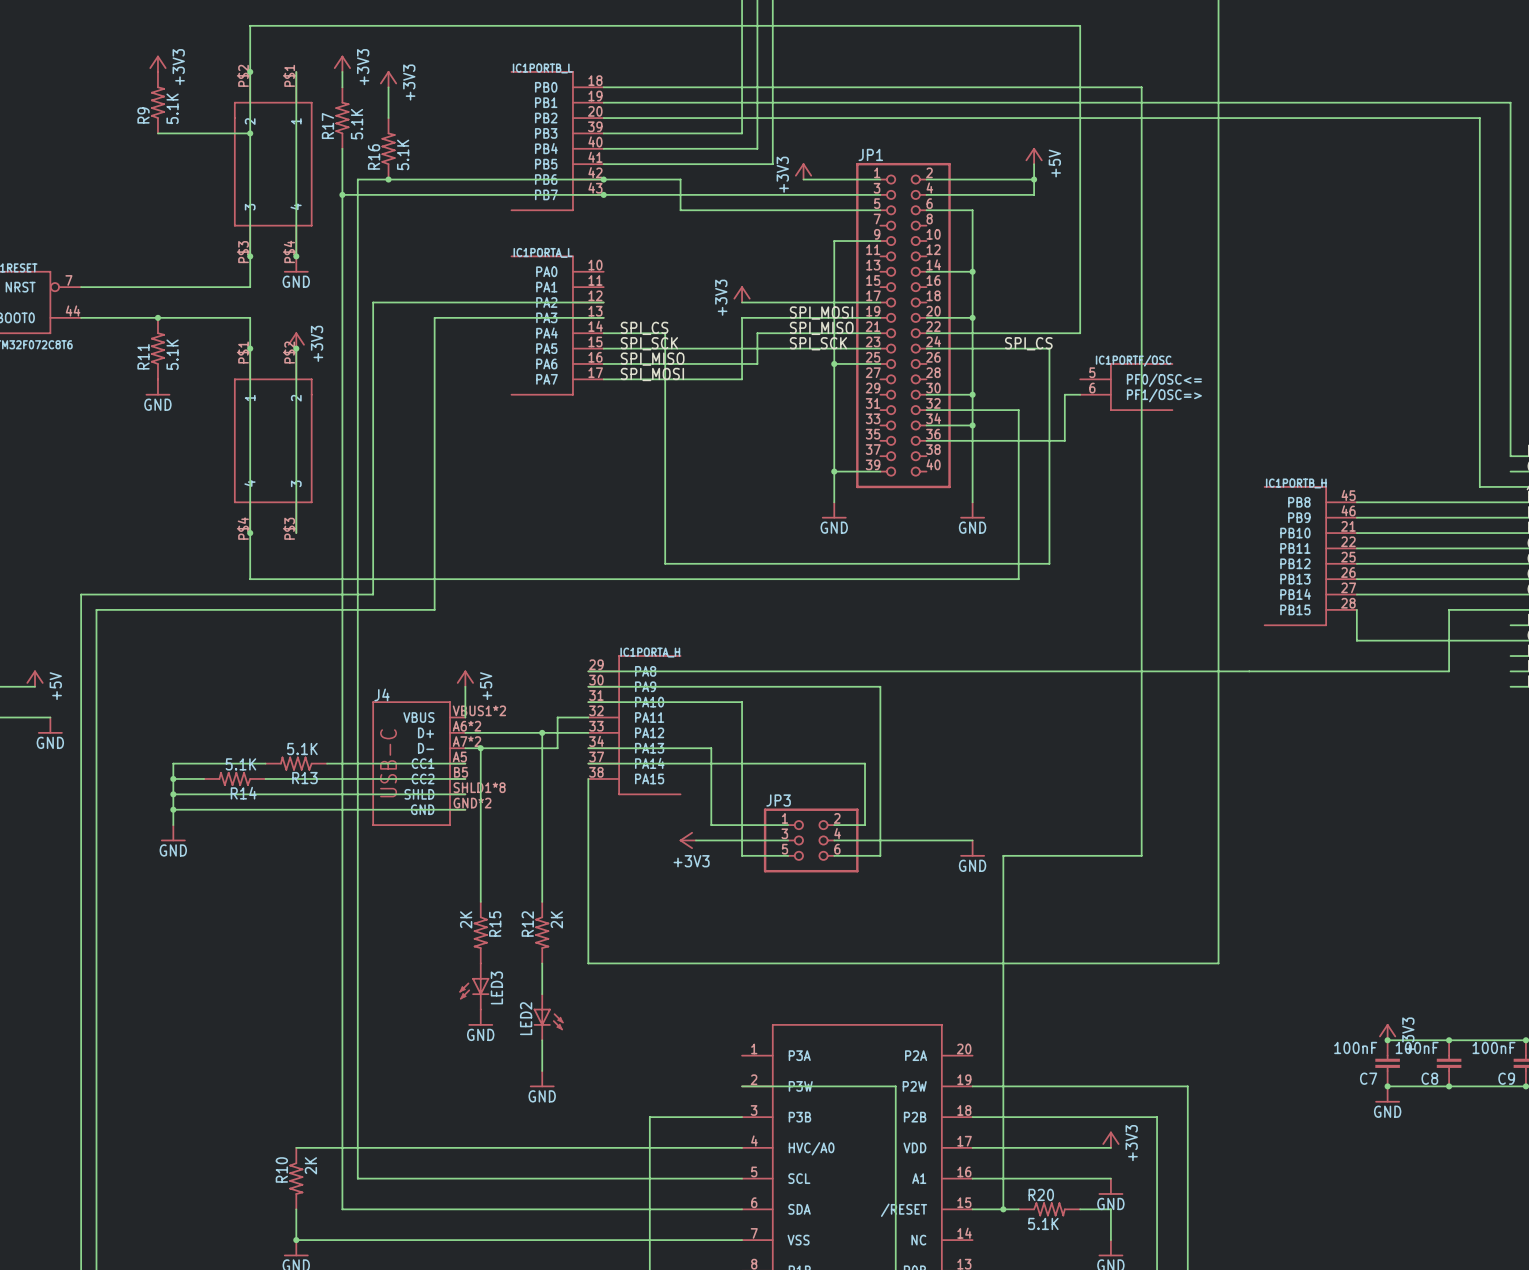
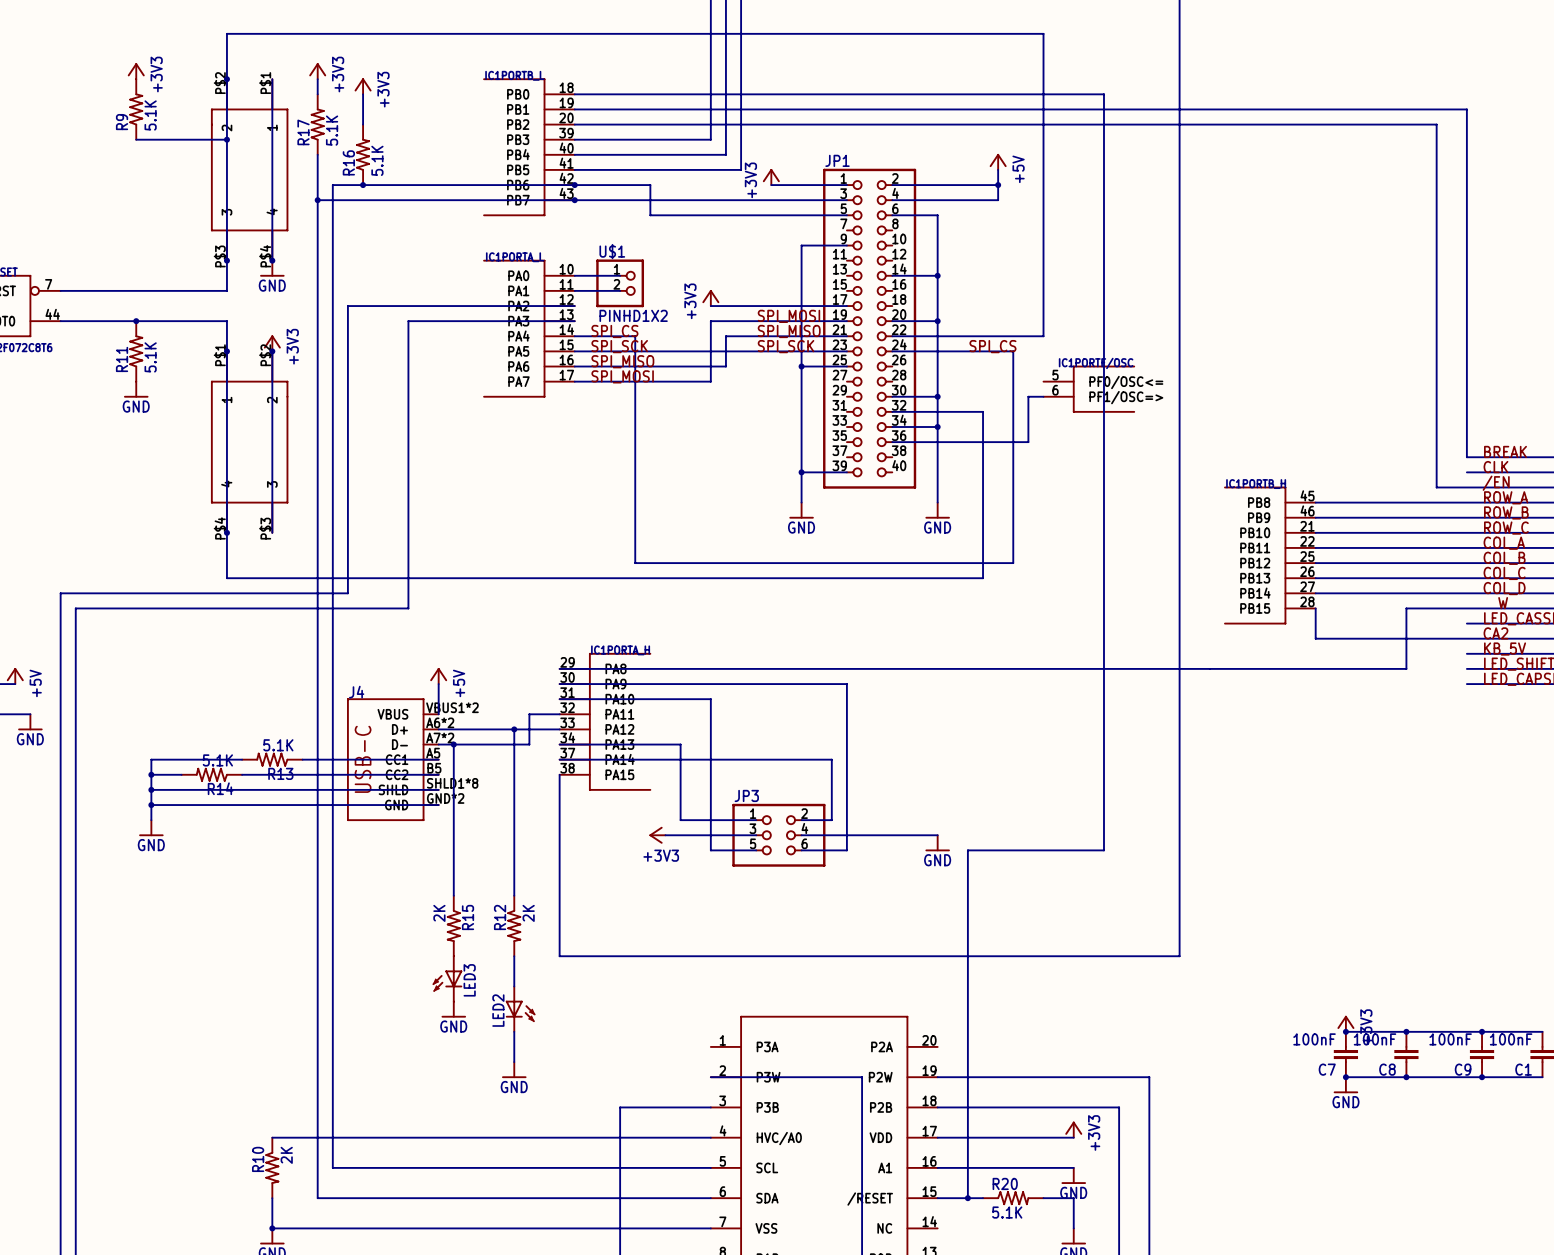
wire: none -> (574, 275) (620, 275)
U$1: none -> PINHD1X2 (620, 283)
wire: none -> (574, 290) (620, 290)

